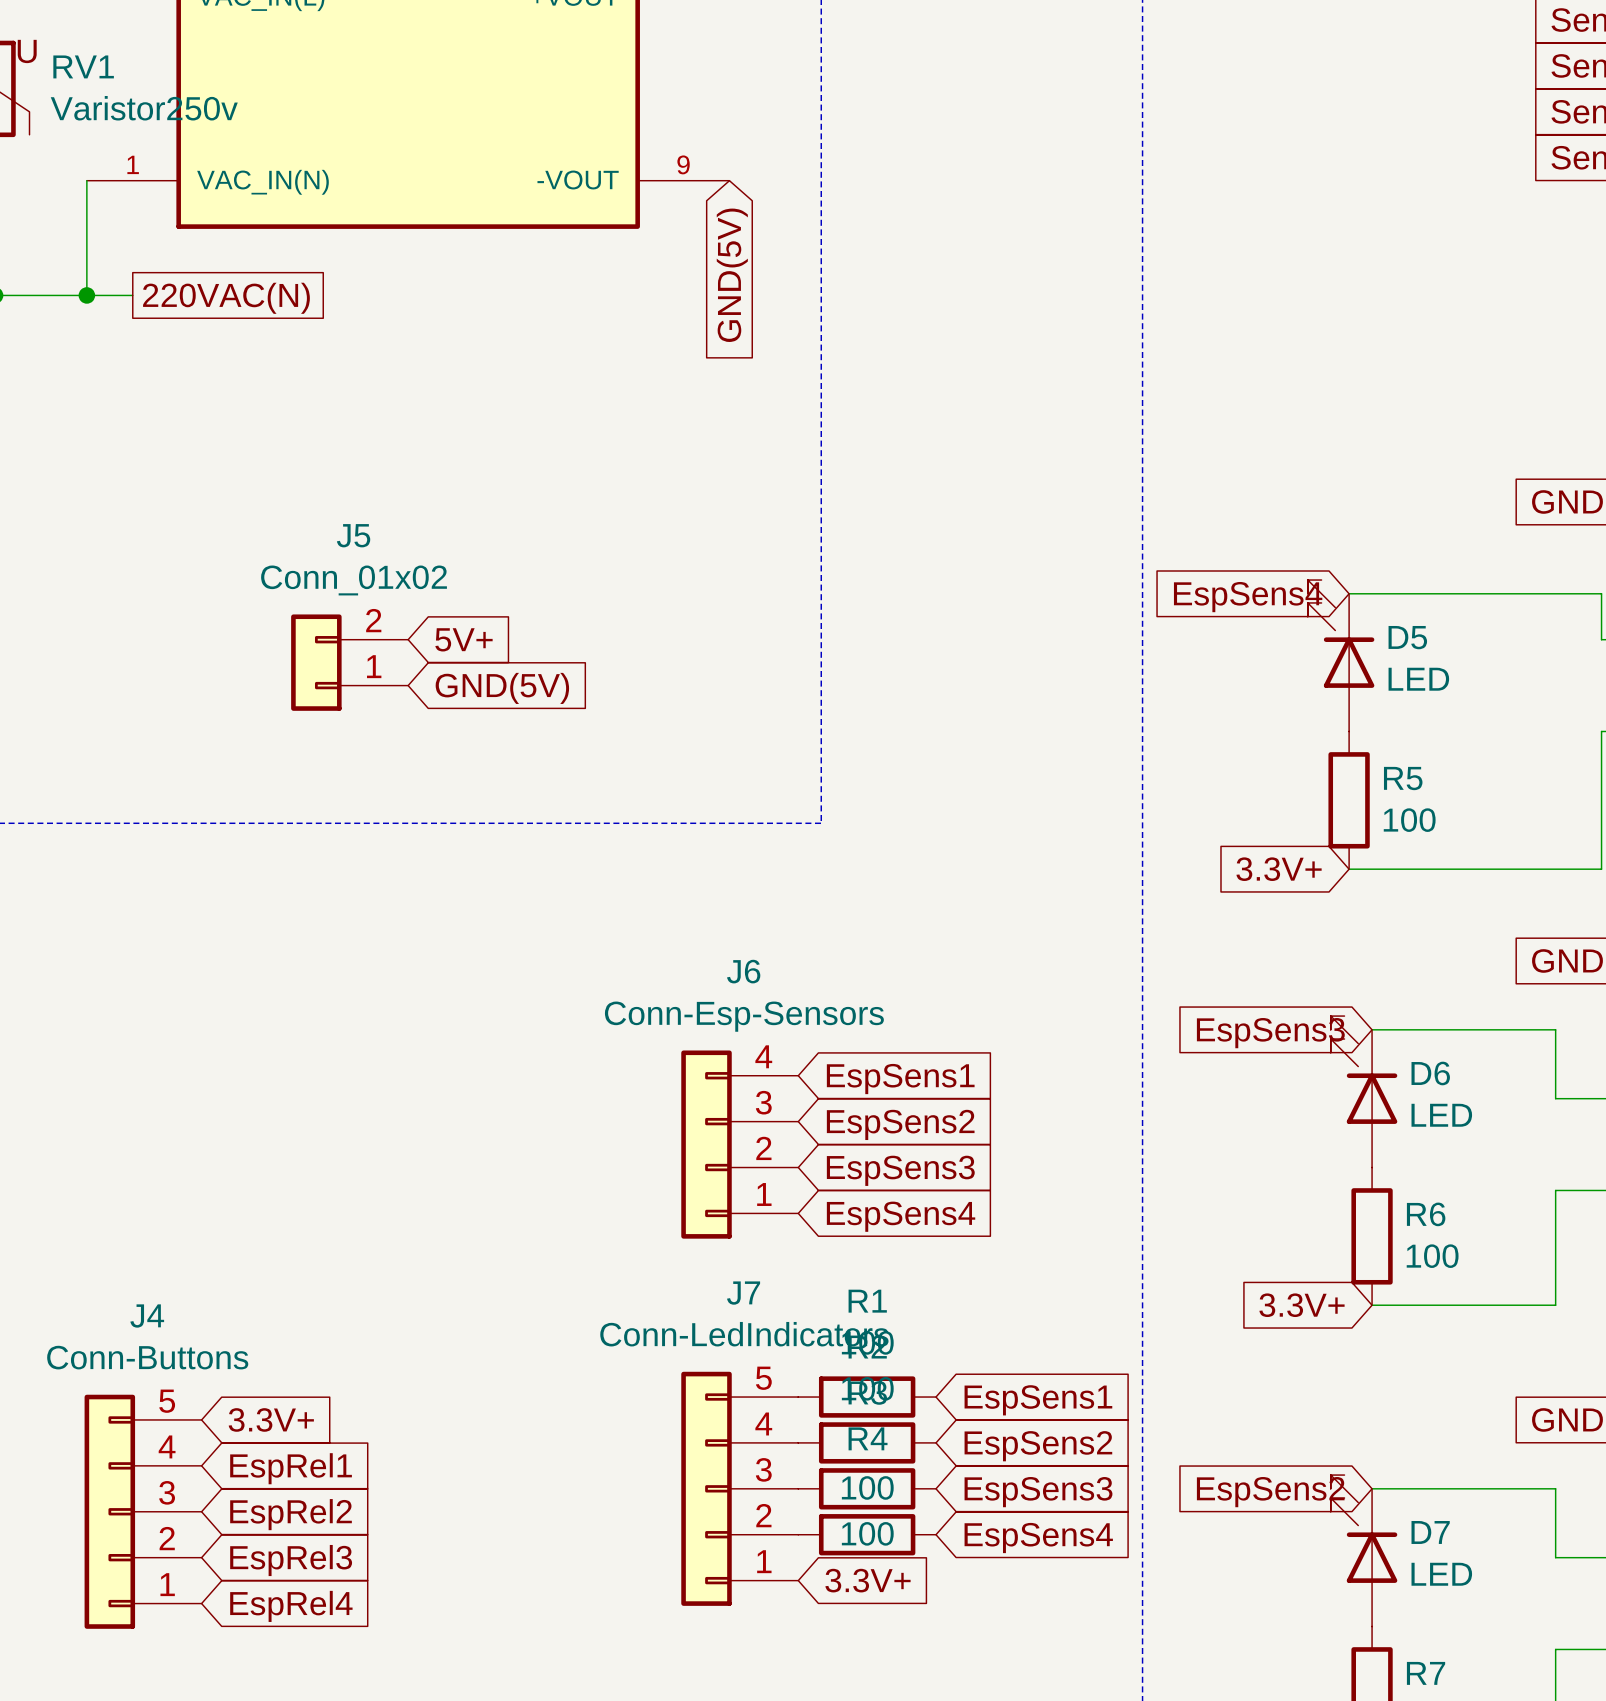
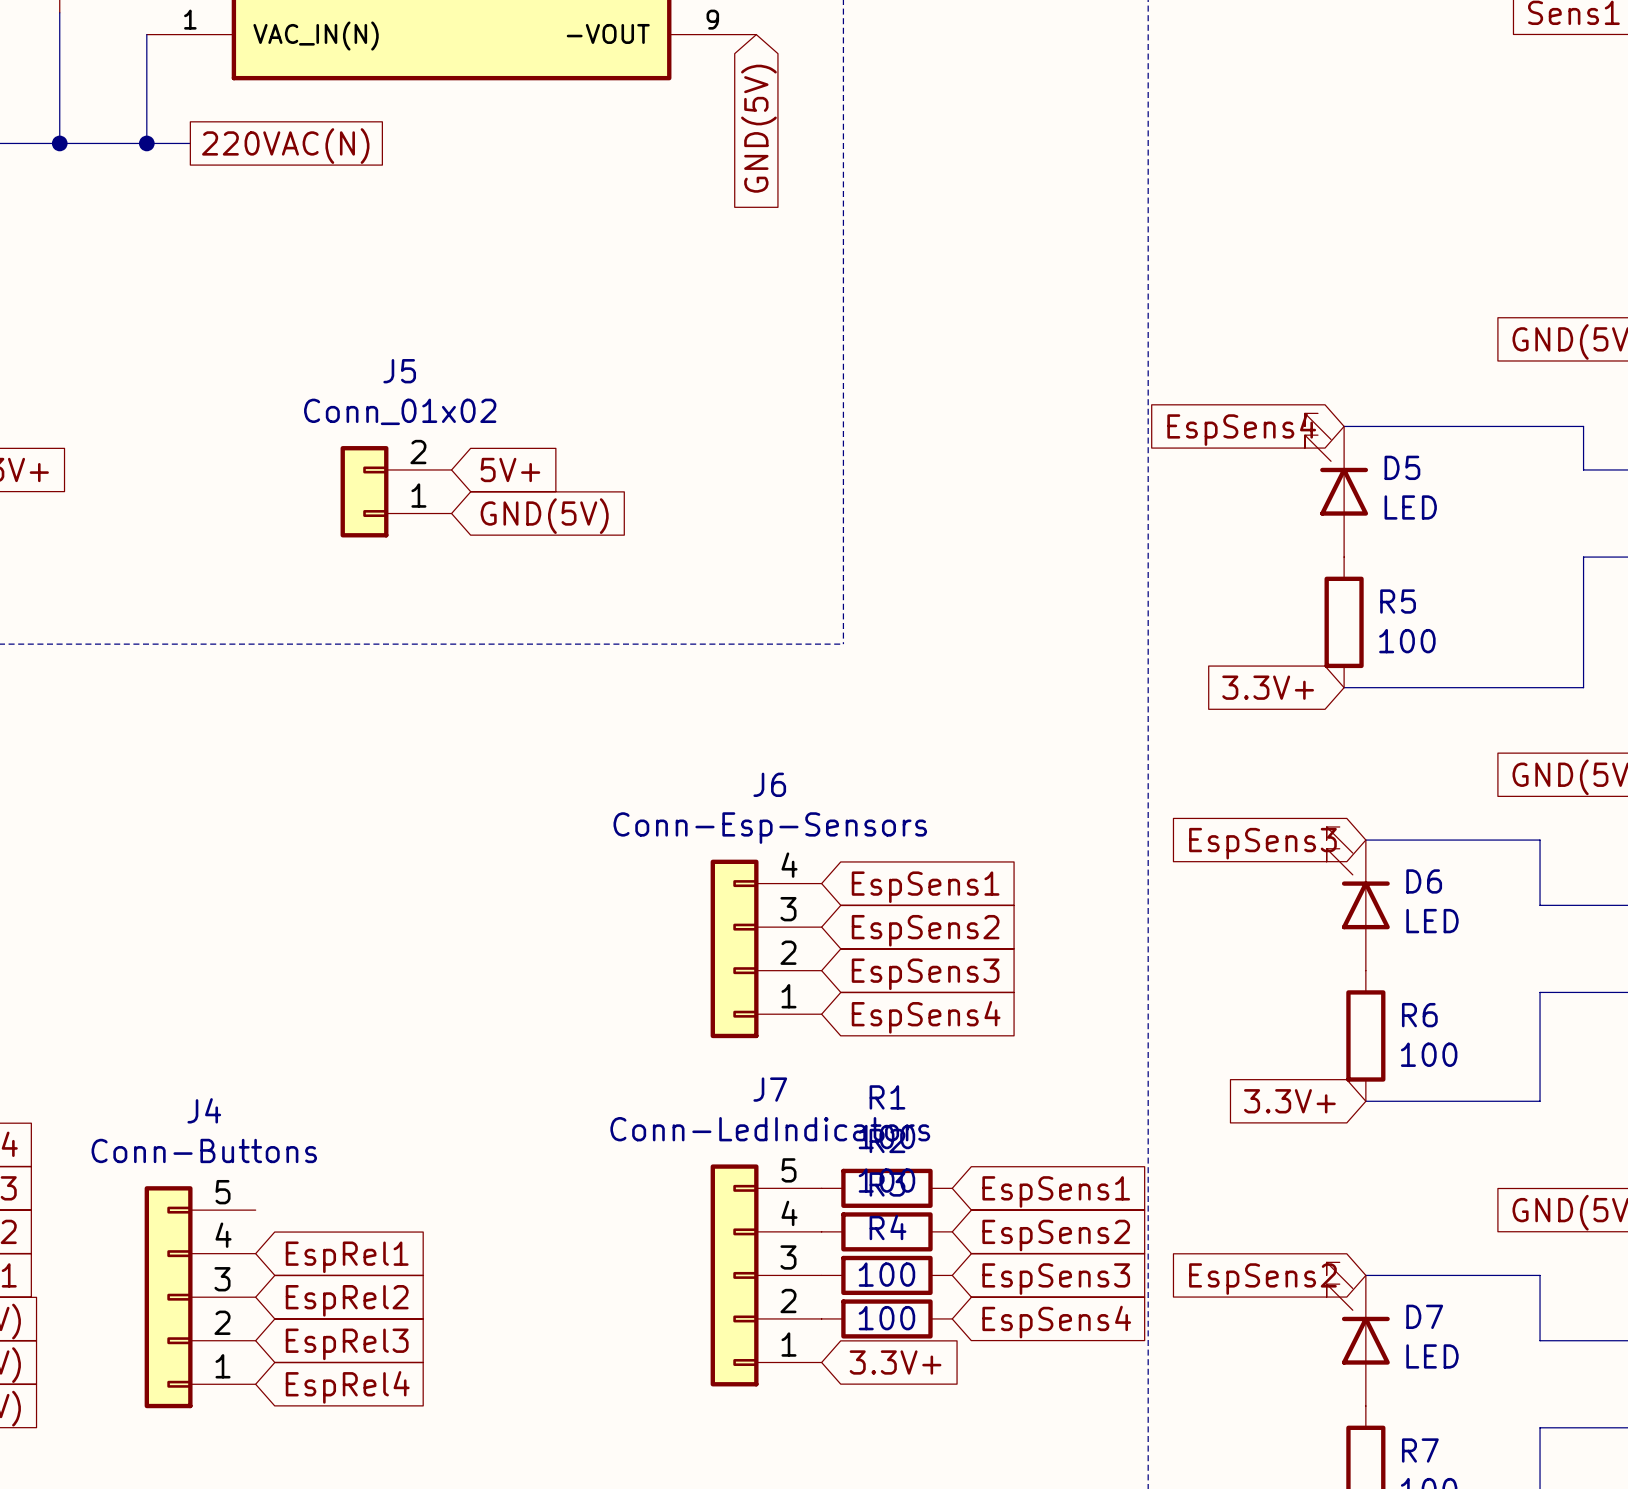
global label: 3.3V+ (271, 1419) -> none

